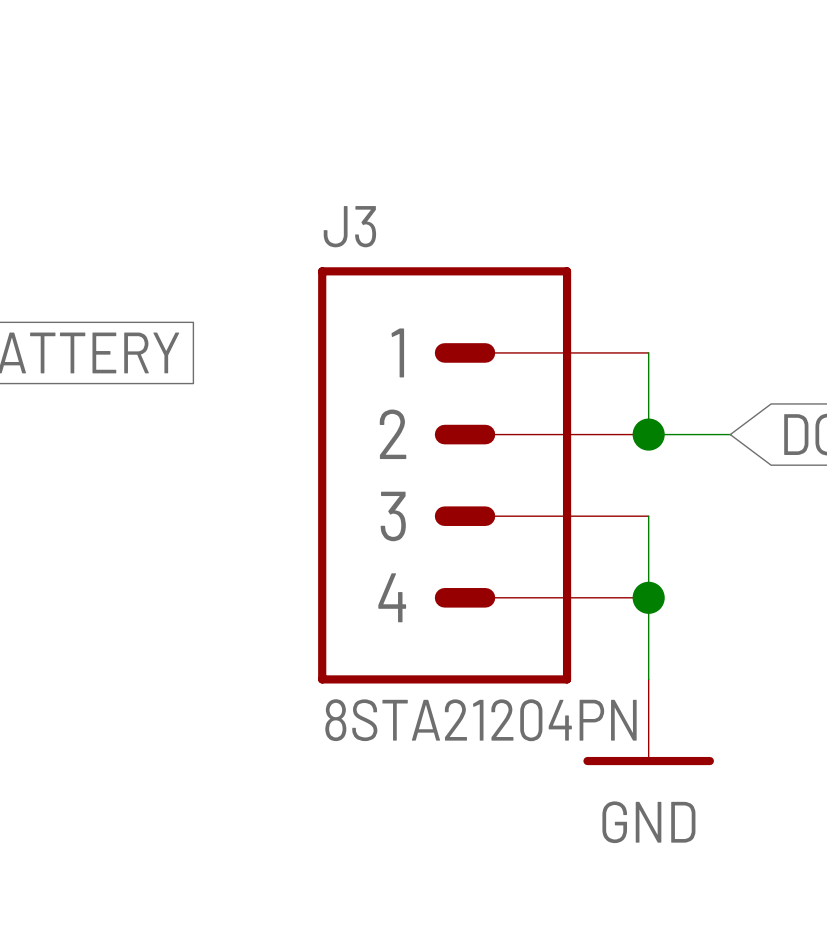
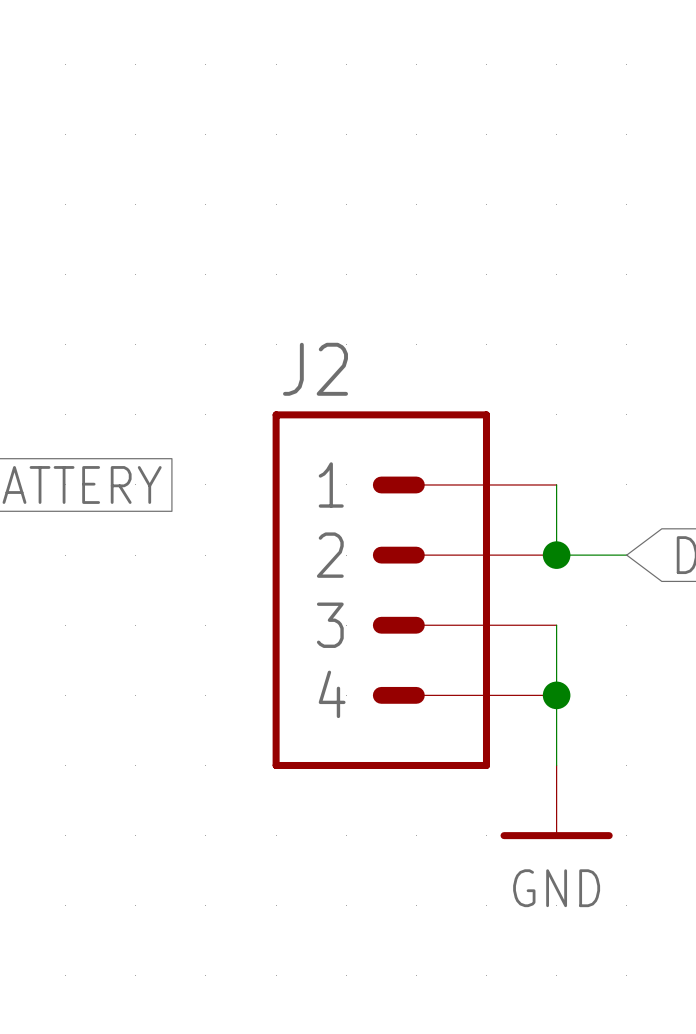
J3 name: J3 (349, 226) -> J2 (315, 369)
J3 text: 8STA21204PN (480, 720) -> none

